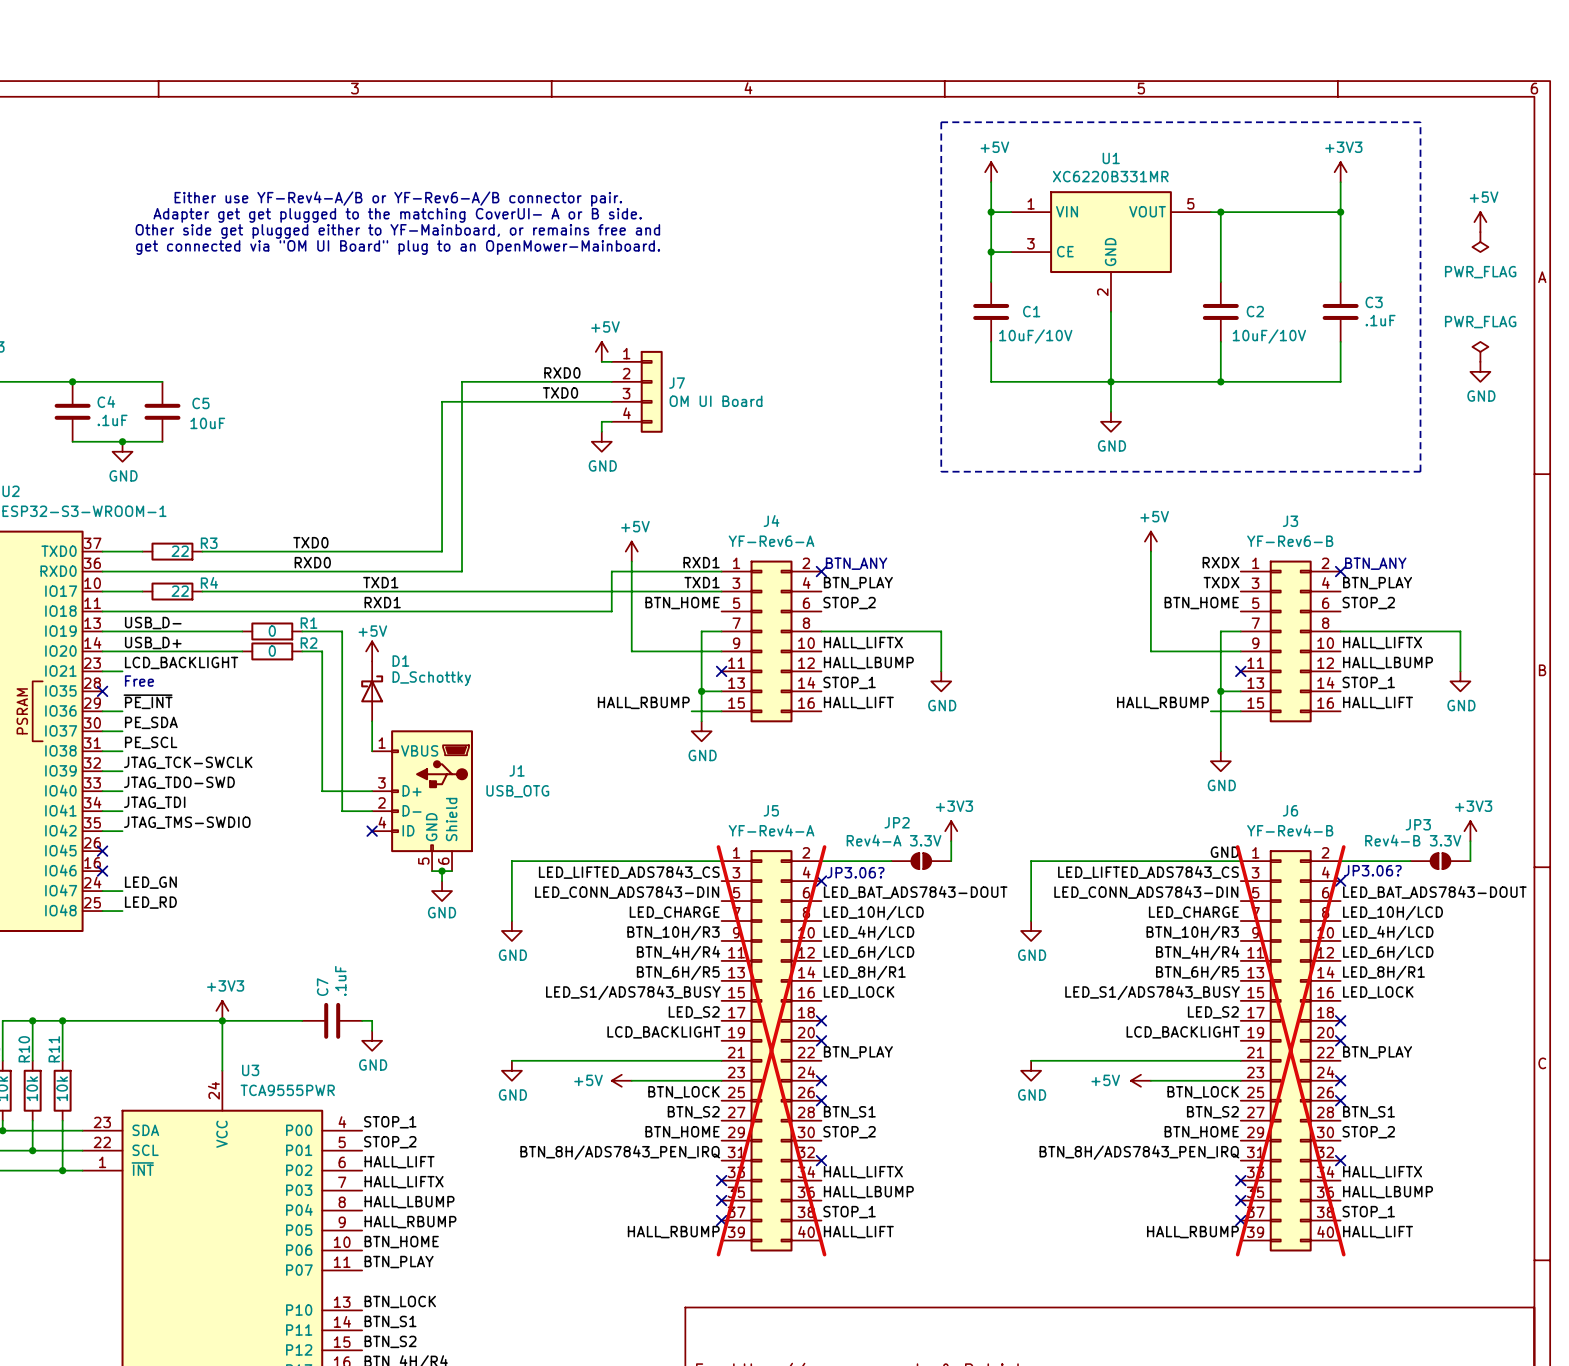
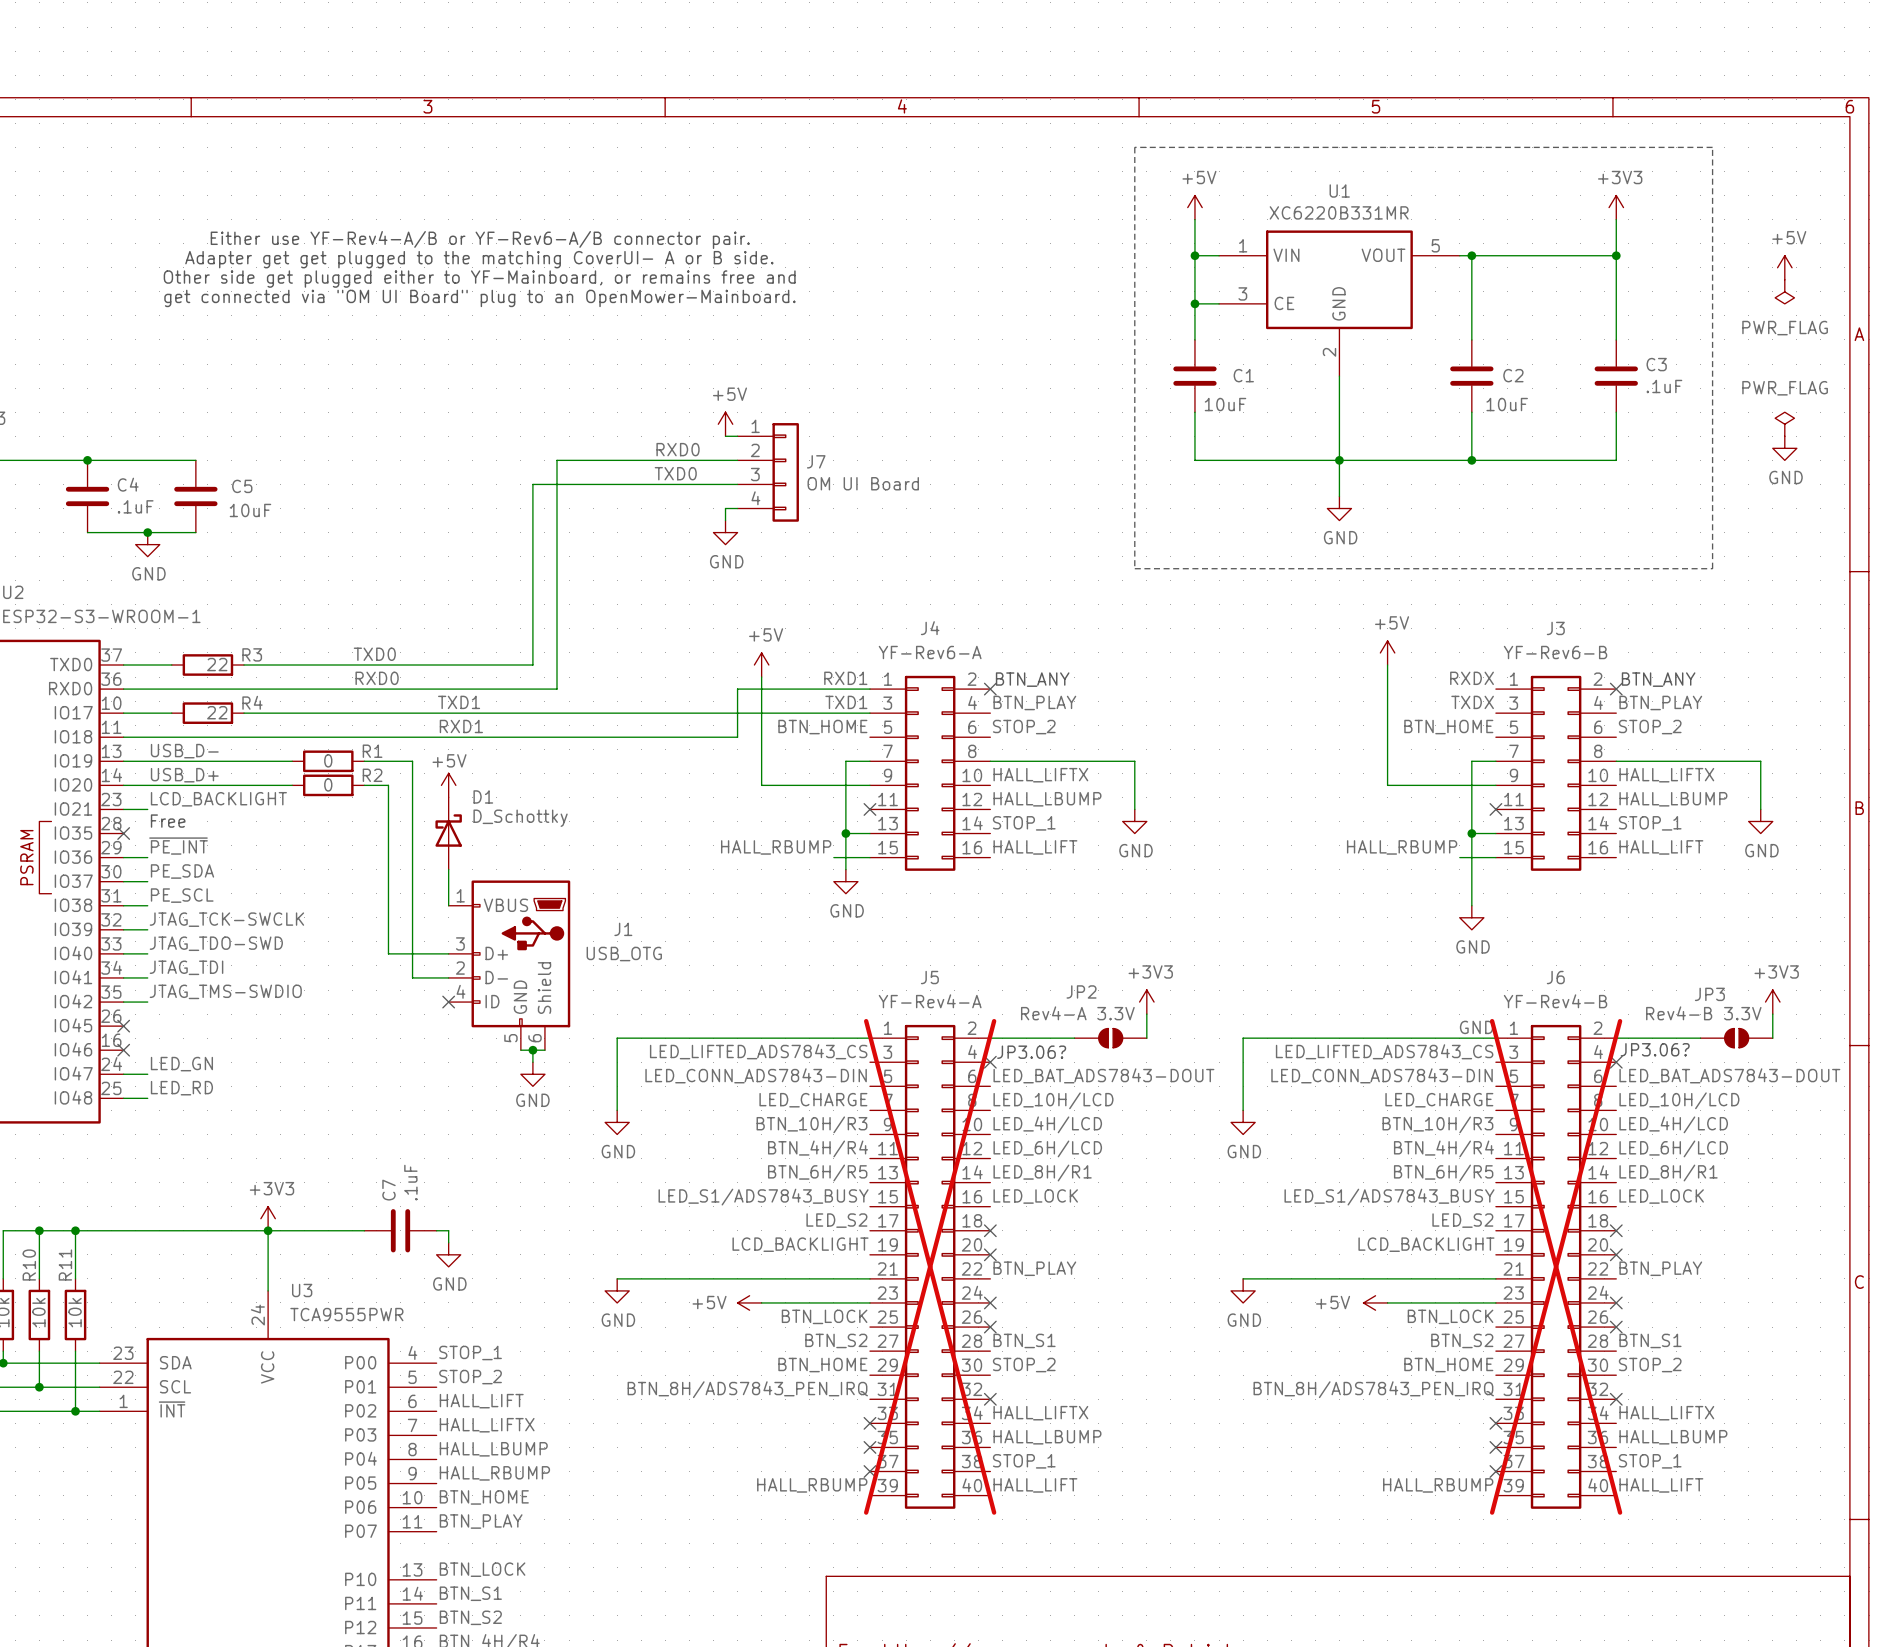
C1 value: 10uF/10V (1035, 336) -> 10uF (1225, 404)
C2 value: 10uF/10V (1269, 336) -> 10uF (1507, 404)

